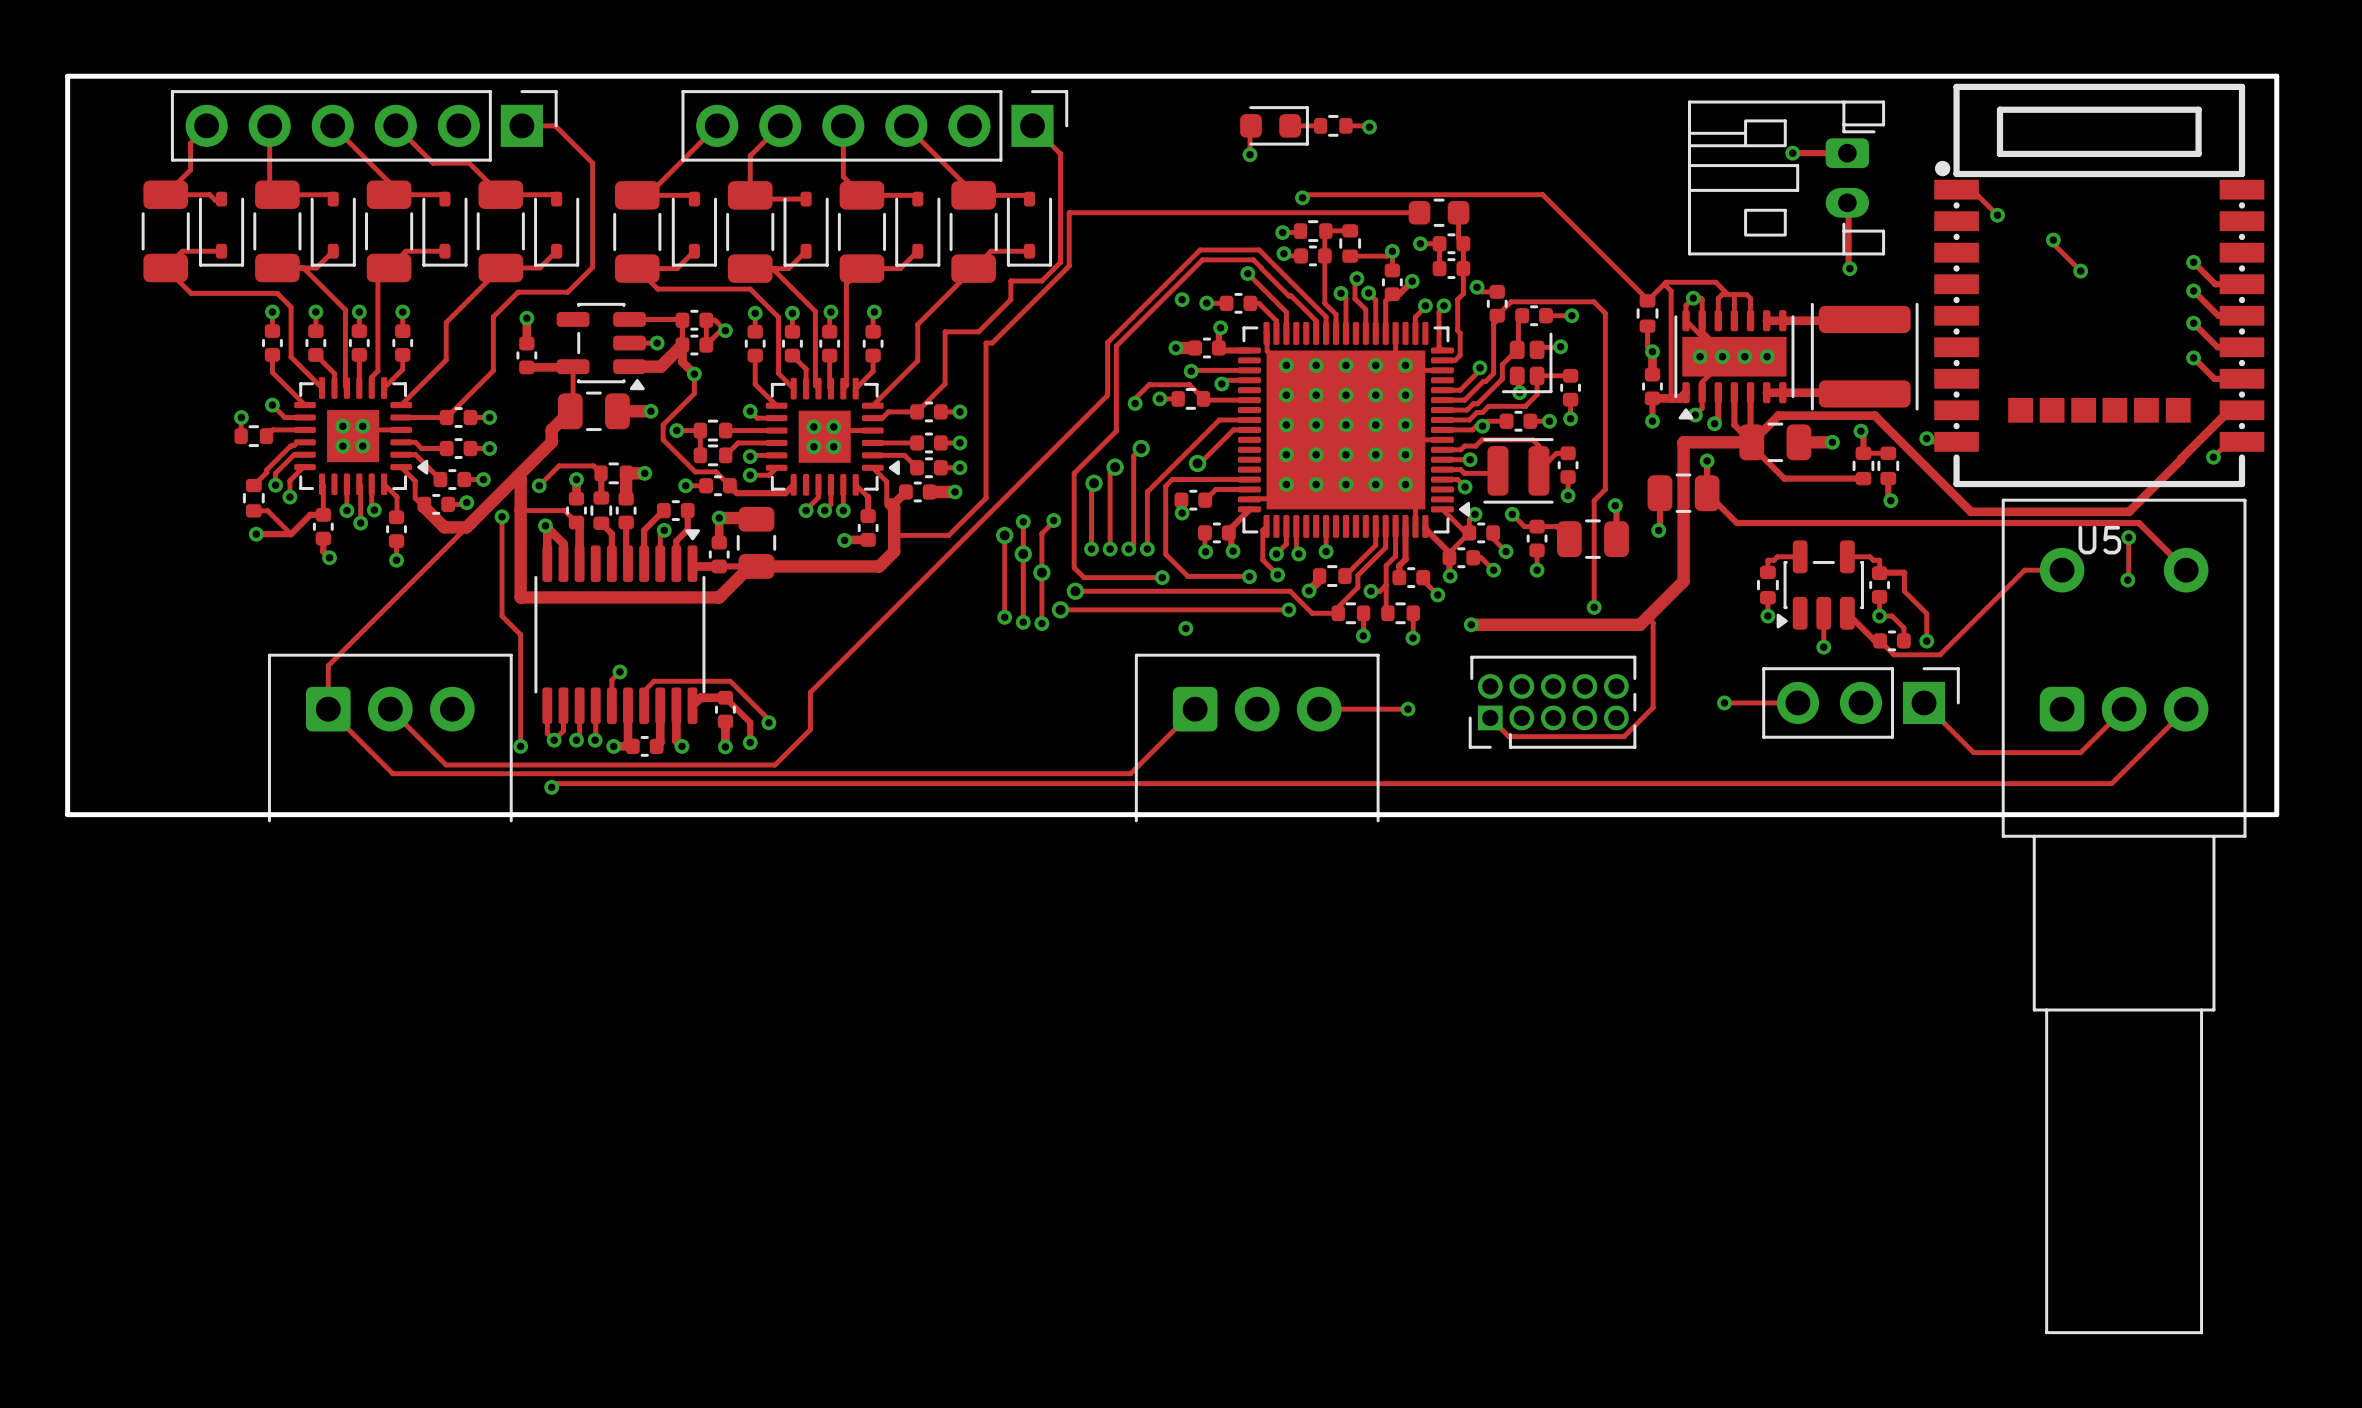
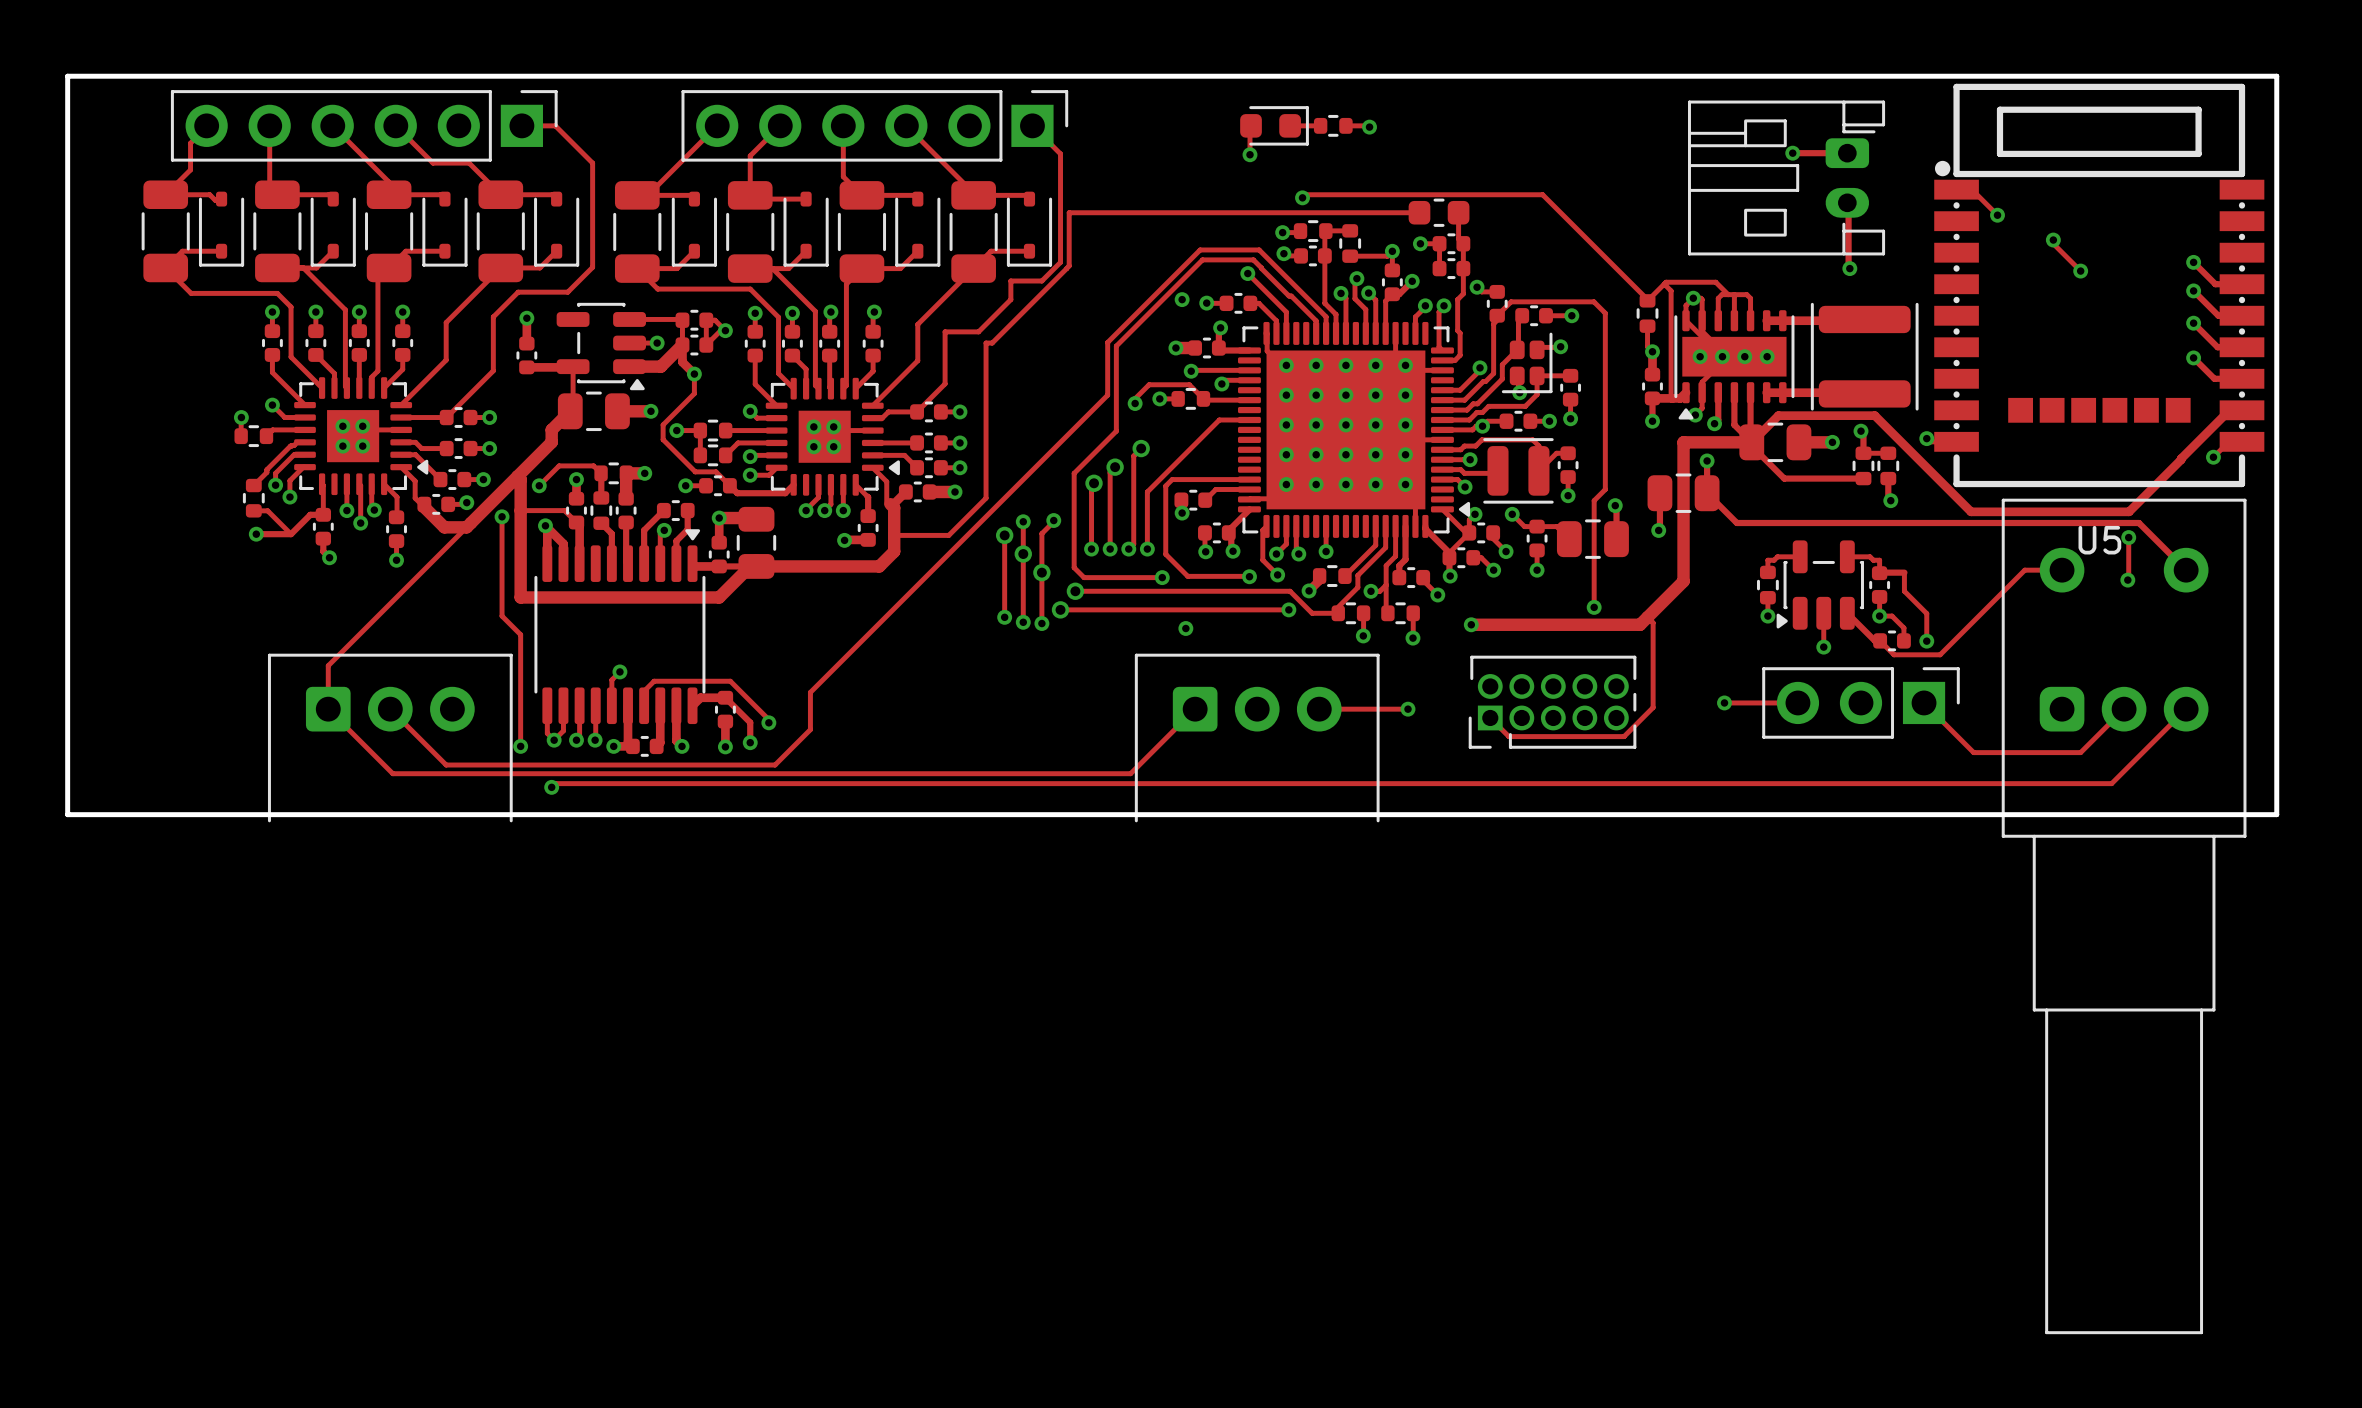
track: (1249, 429) (1233, 429) (1201, 462) -> none
via: (1197, 463) -> none

